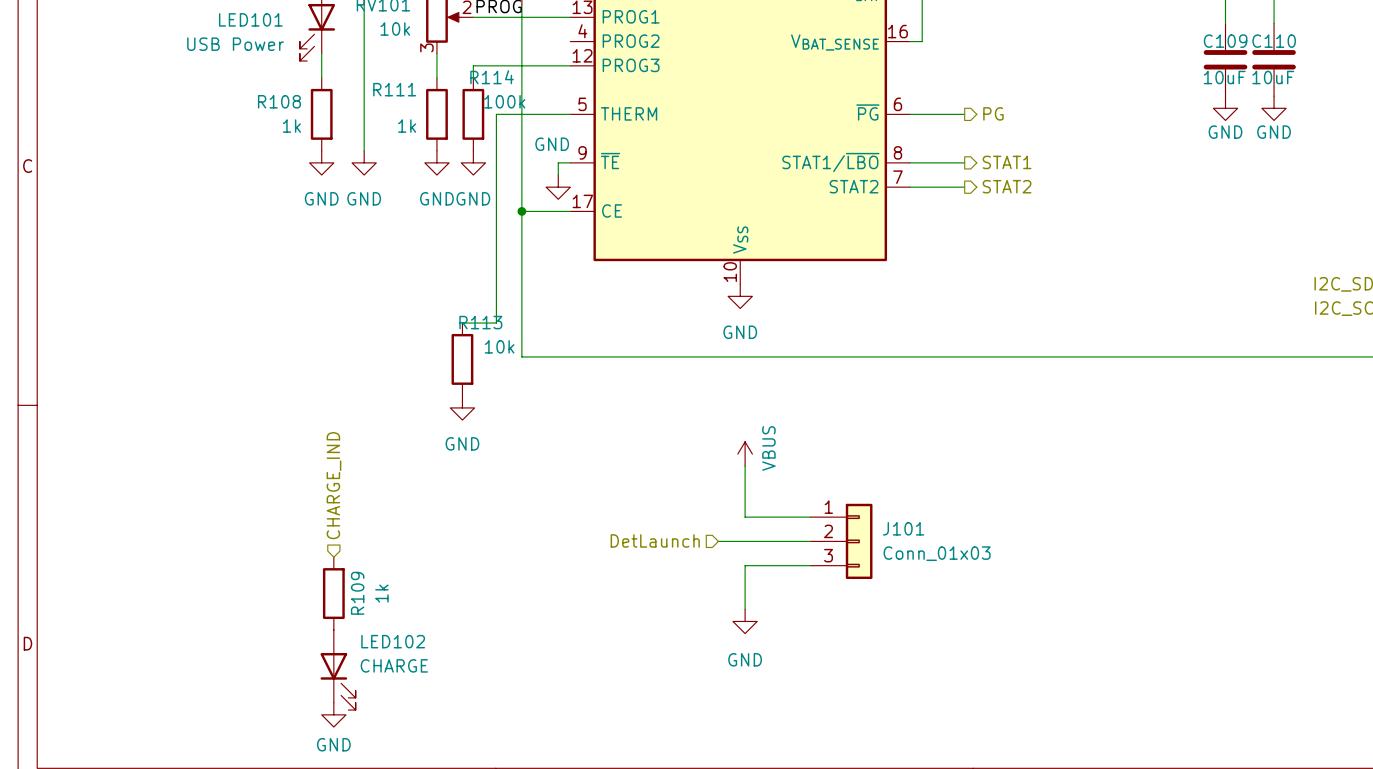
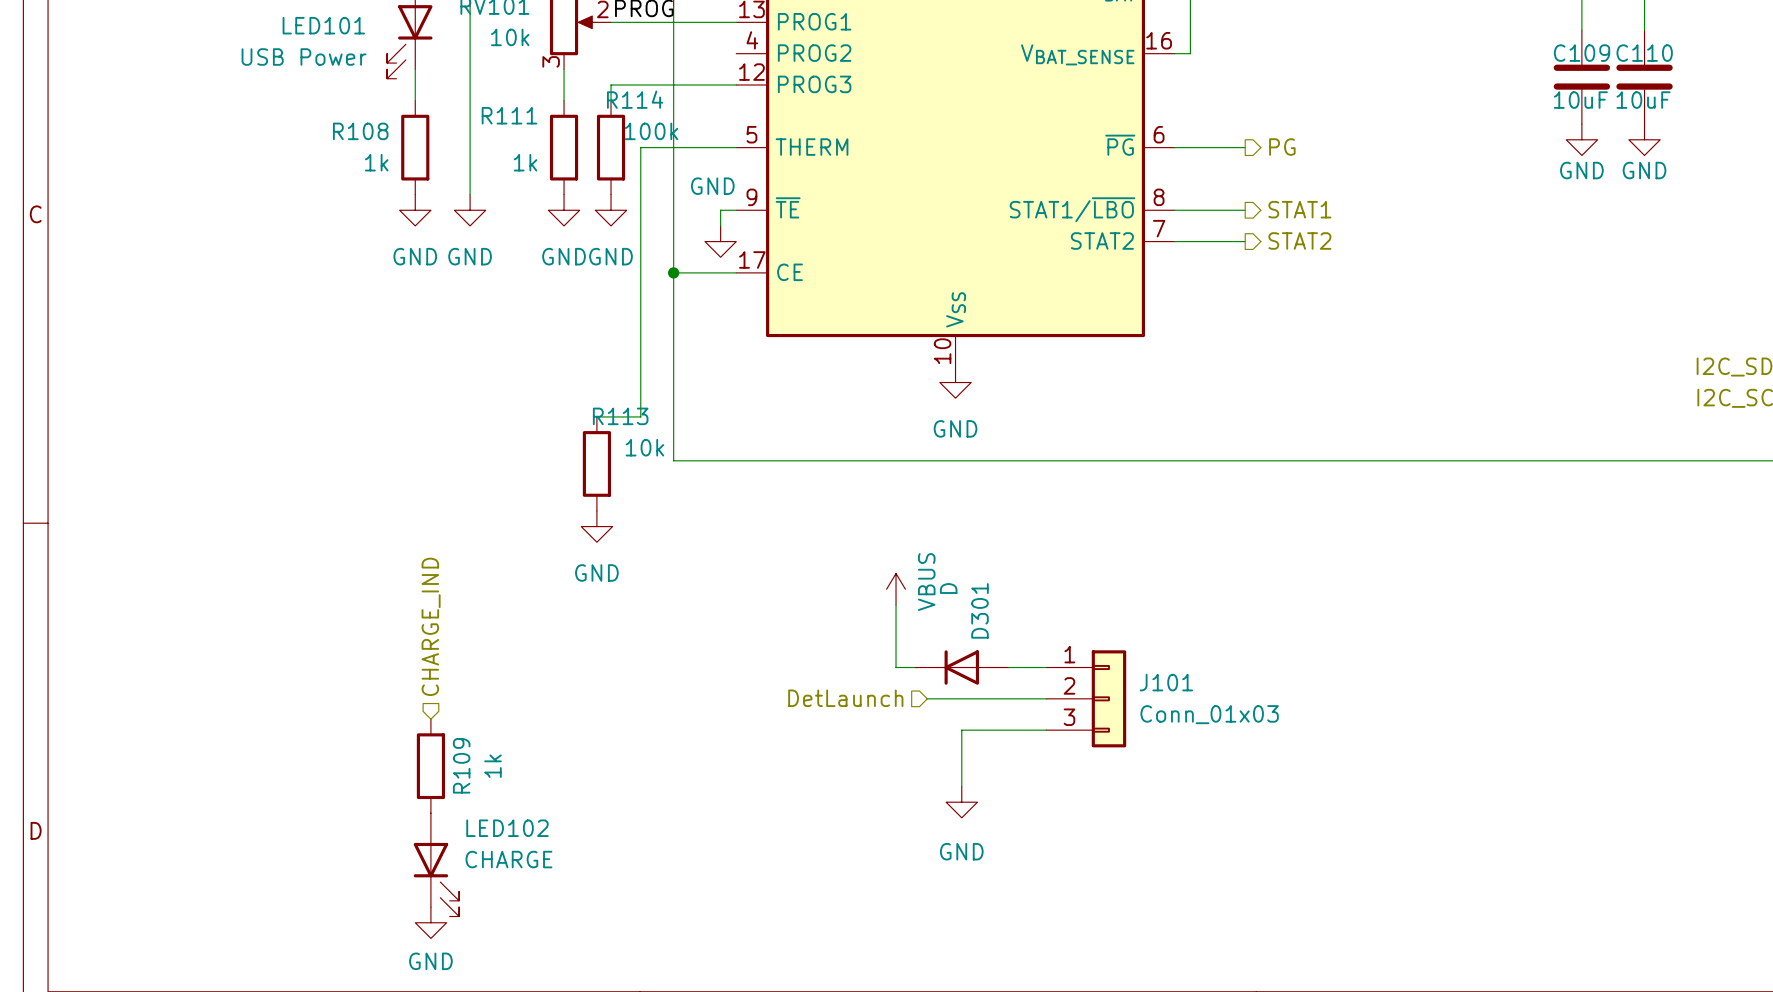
power symbol position: VBUS (745, 454) -> VBUS (896, 589)
wire: (745, 466) (745, 517) (781, 517) -> none
wire: none -> (896, 604) (896, 667) (914, 667)
D301: none -> D (961, 667)

